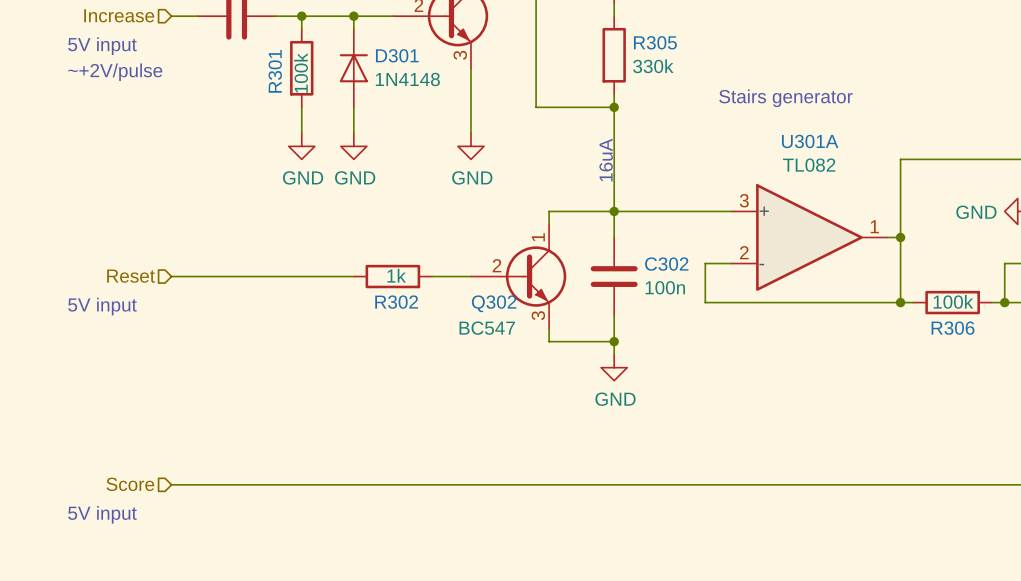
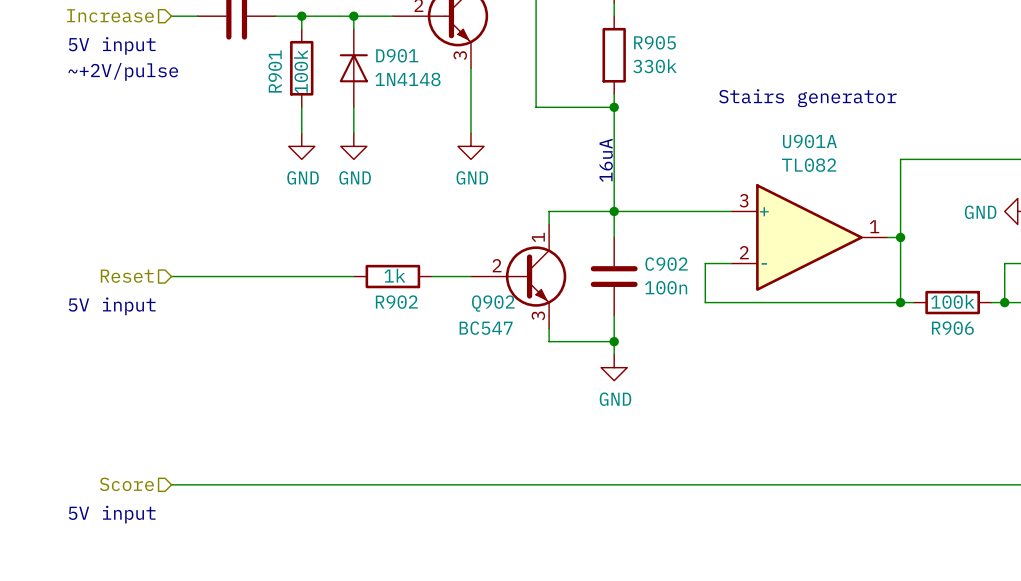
R305 name: R305 (655, 42) -> R905 (655, 42)
D301 name: D301 (397, 55) -> D901 (397, 55)
R301 name: R301 (275, 71) -> R901 (275, 71)
U301A name: U301A (810, 141) -> U901A (809, 141)
C302 name: C302 (666, 264) -> C902 (666, 264)
R302 name: R302 (396, 302) -> R902 (396, 302)
Q302 name: Q302 (494, 303) -> Q902 (493, 303)
R306 name: R306 (953, 328) -> R906 (952, 328)

